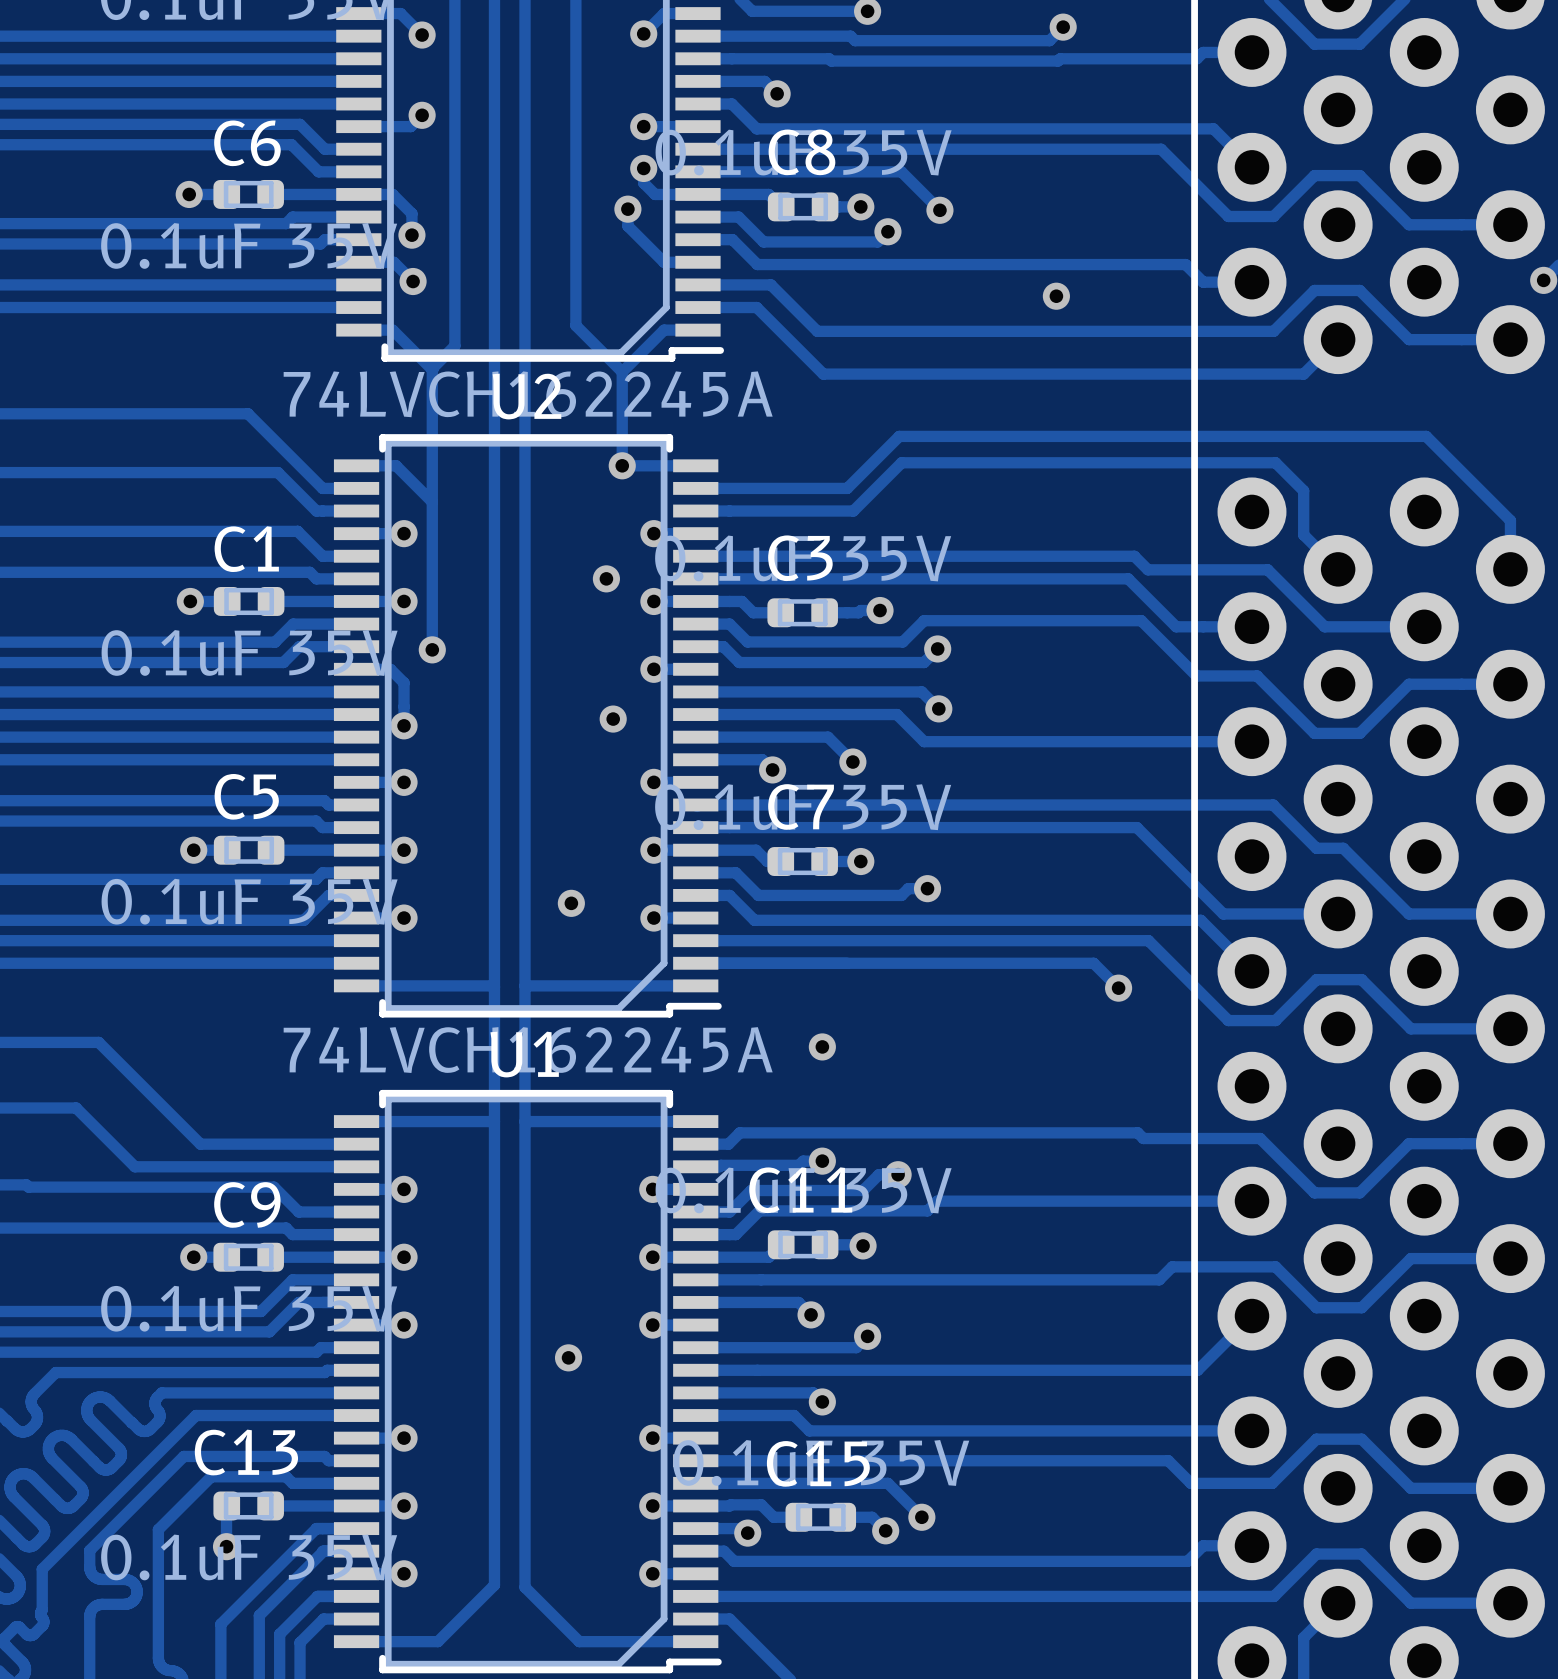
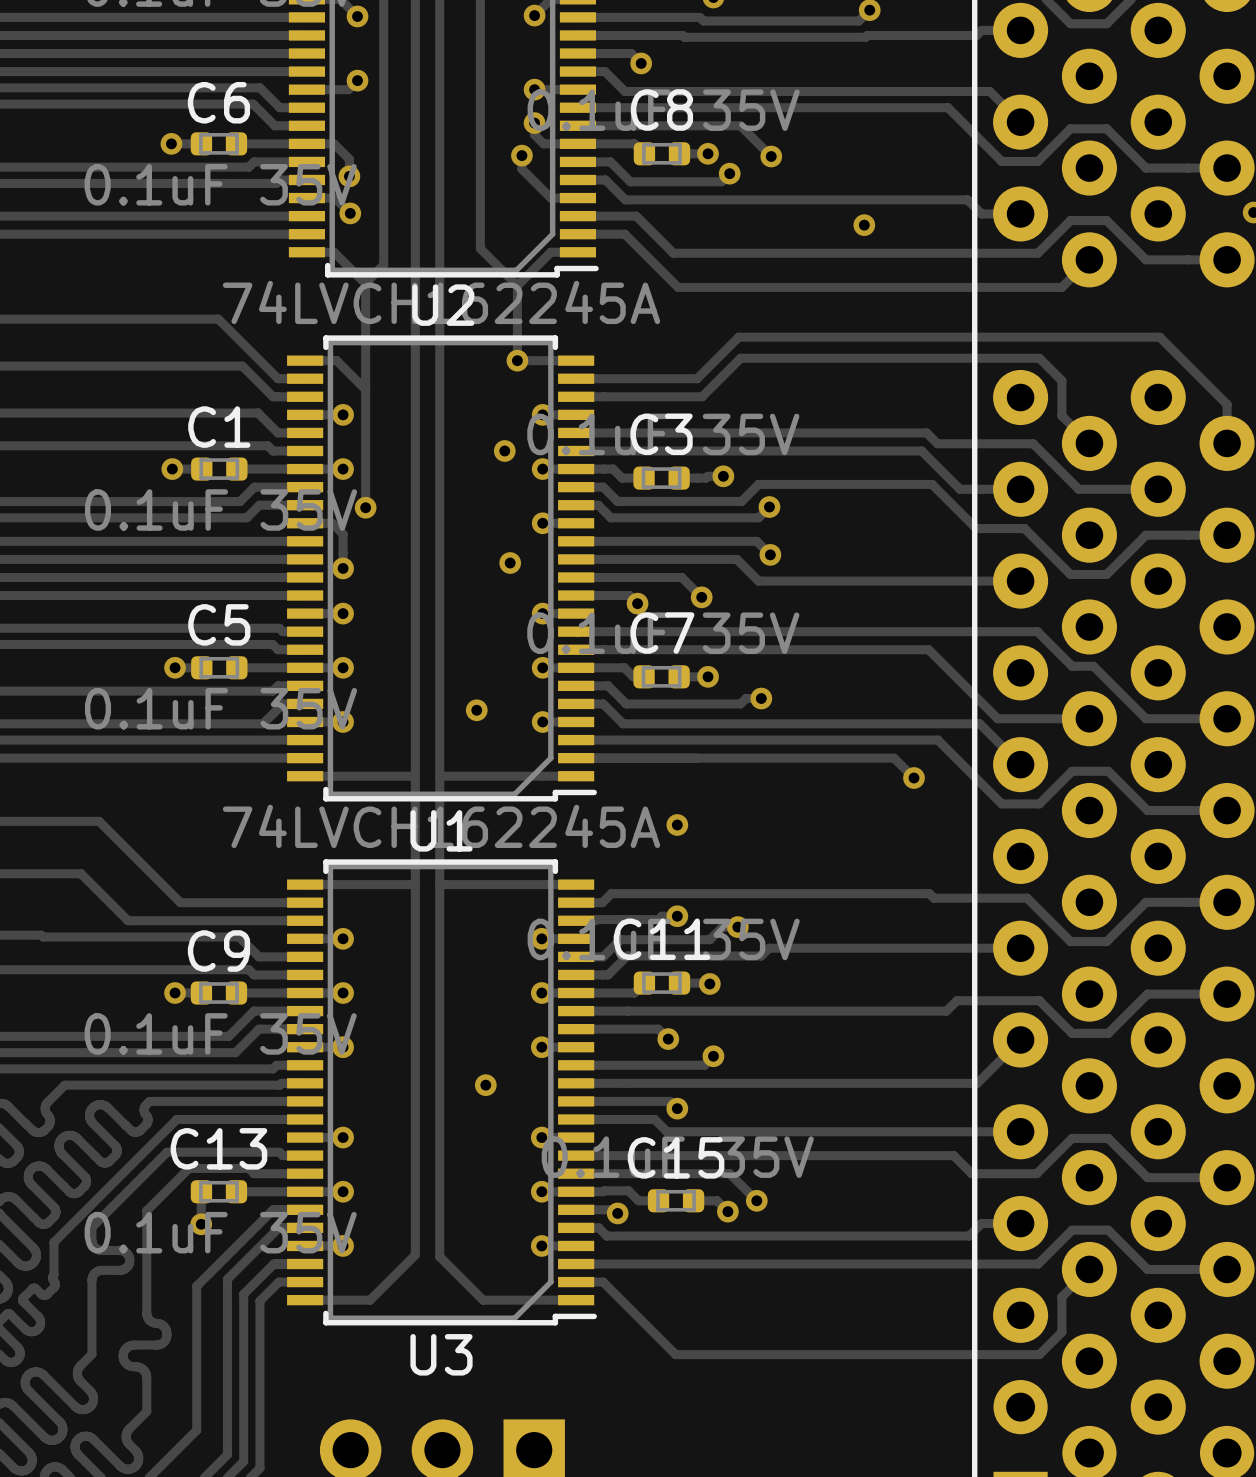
via position: (568, 1357) -> (485, 1085)

